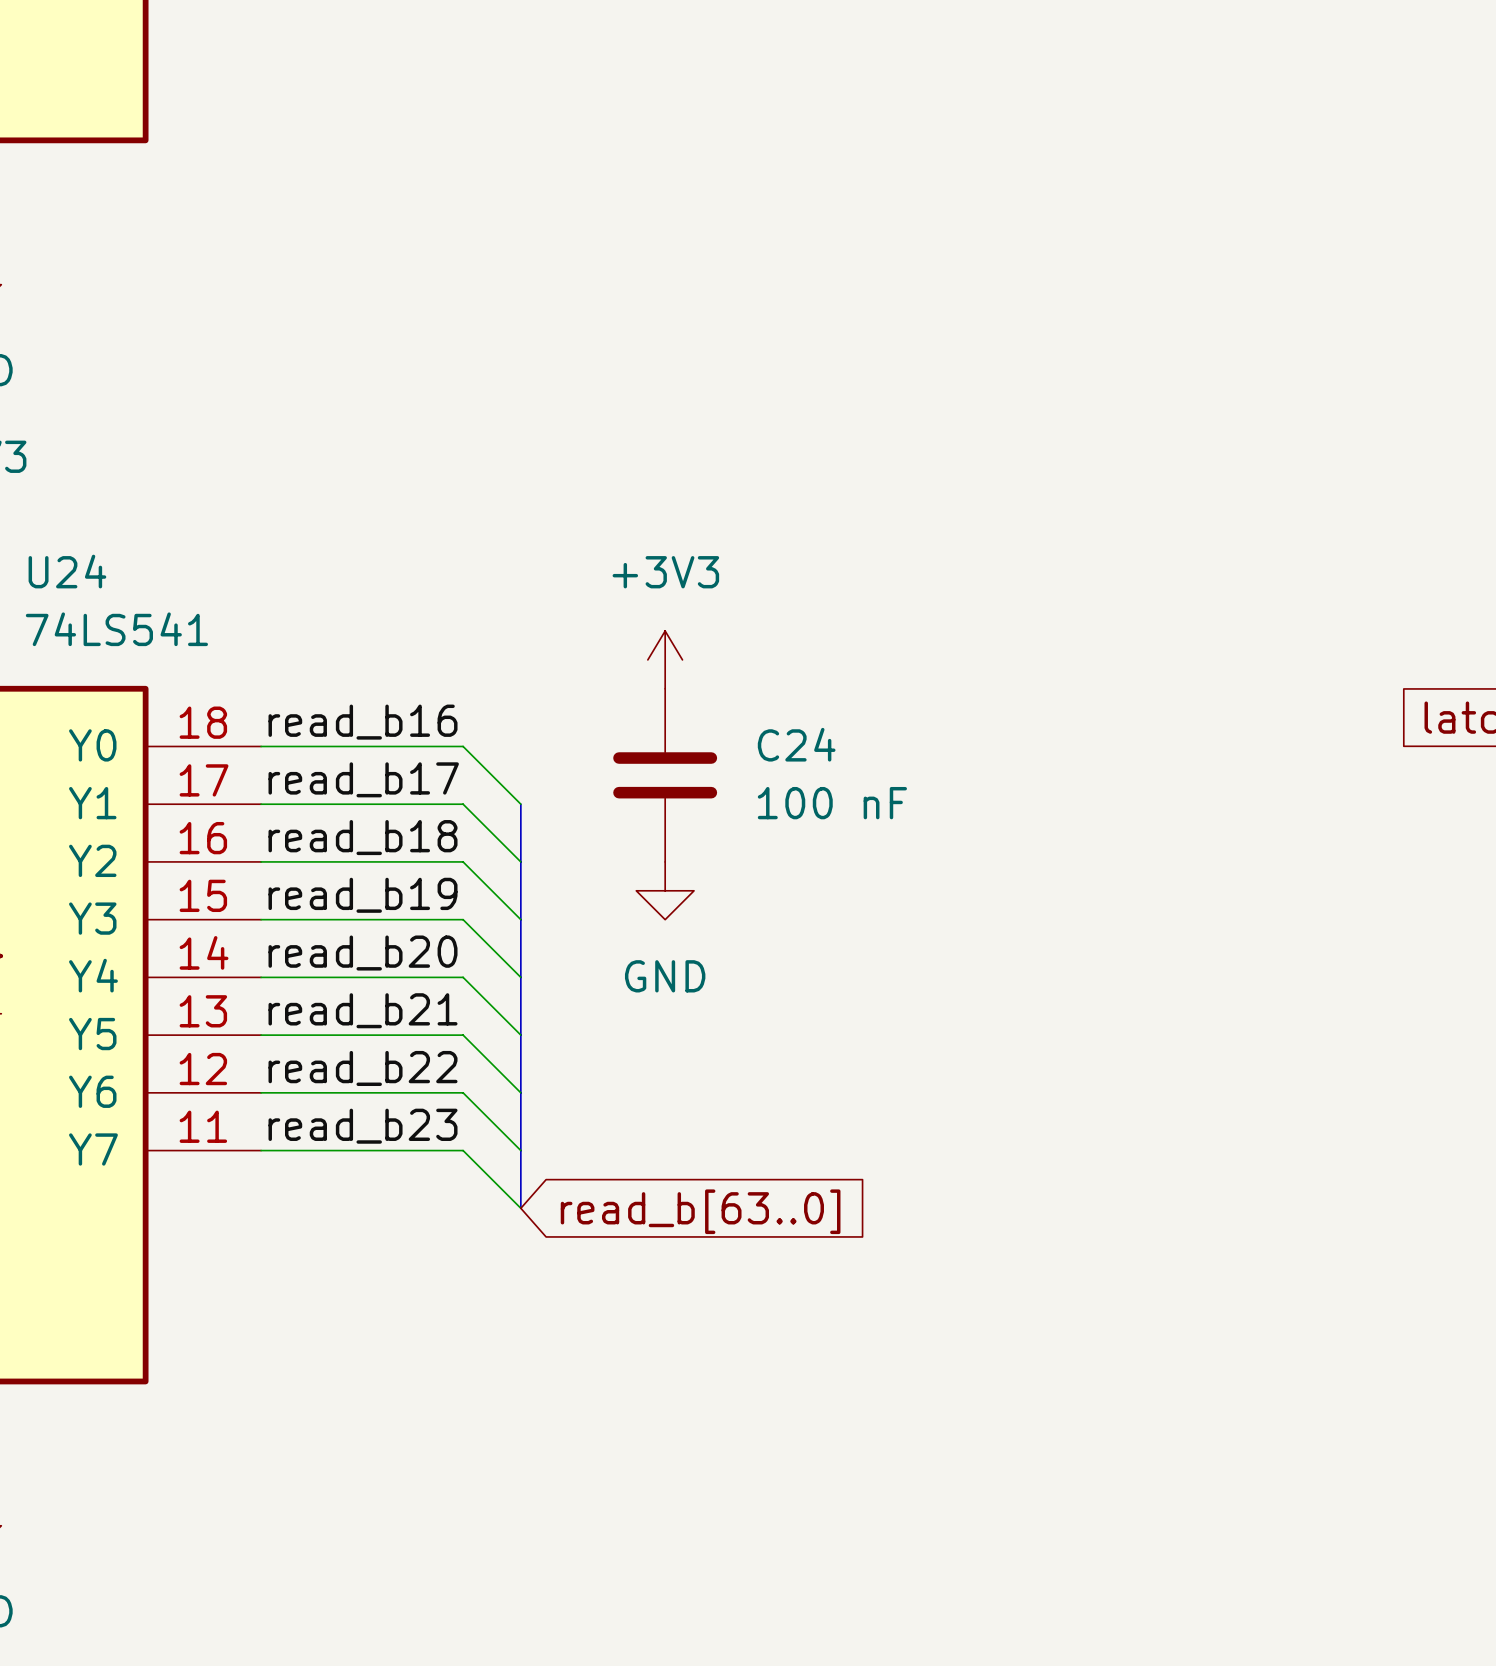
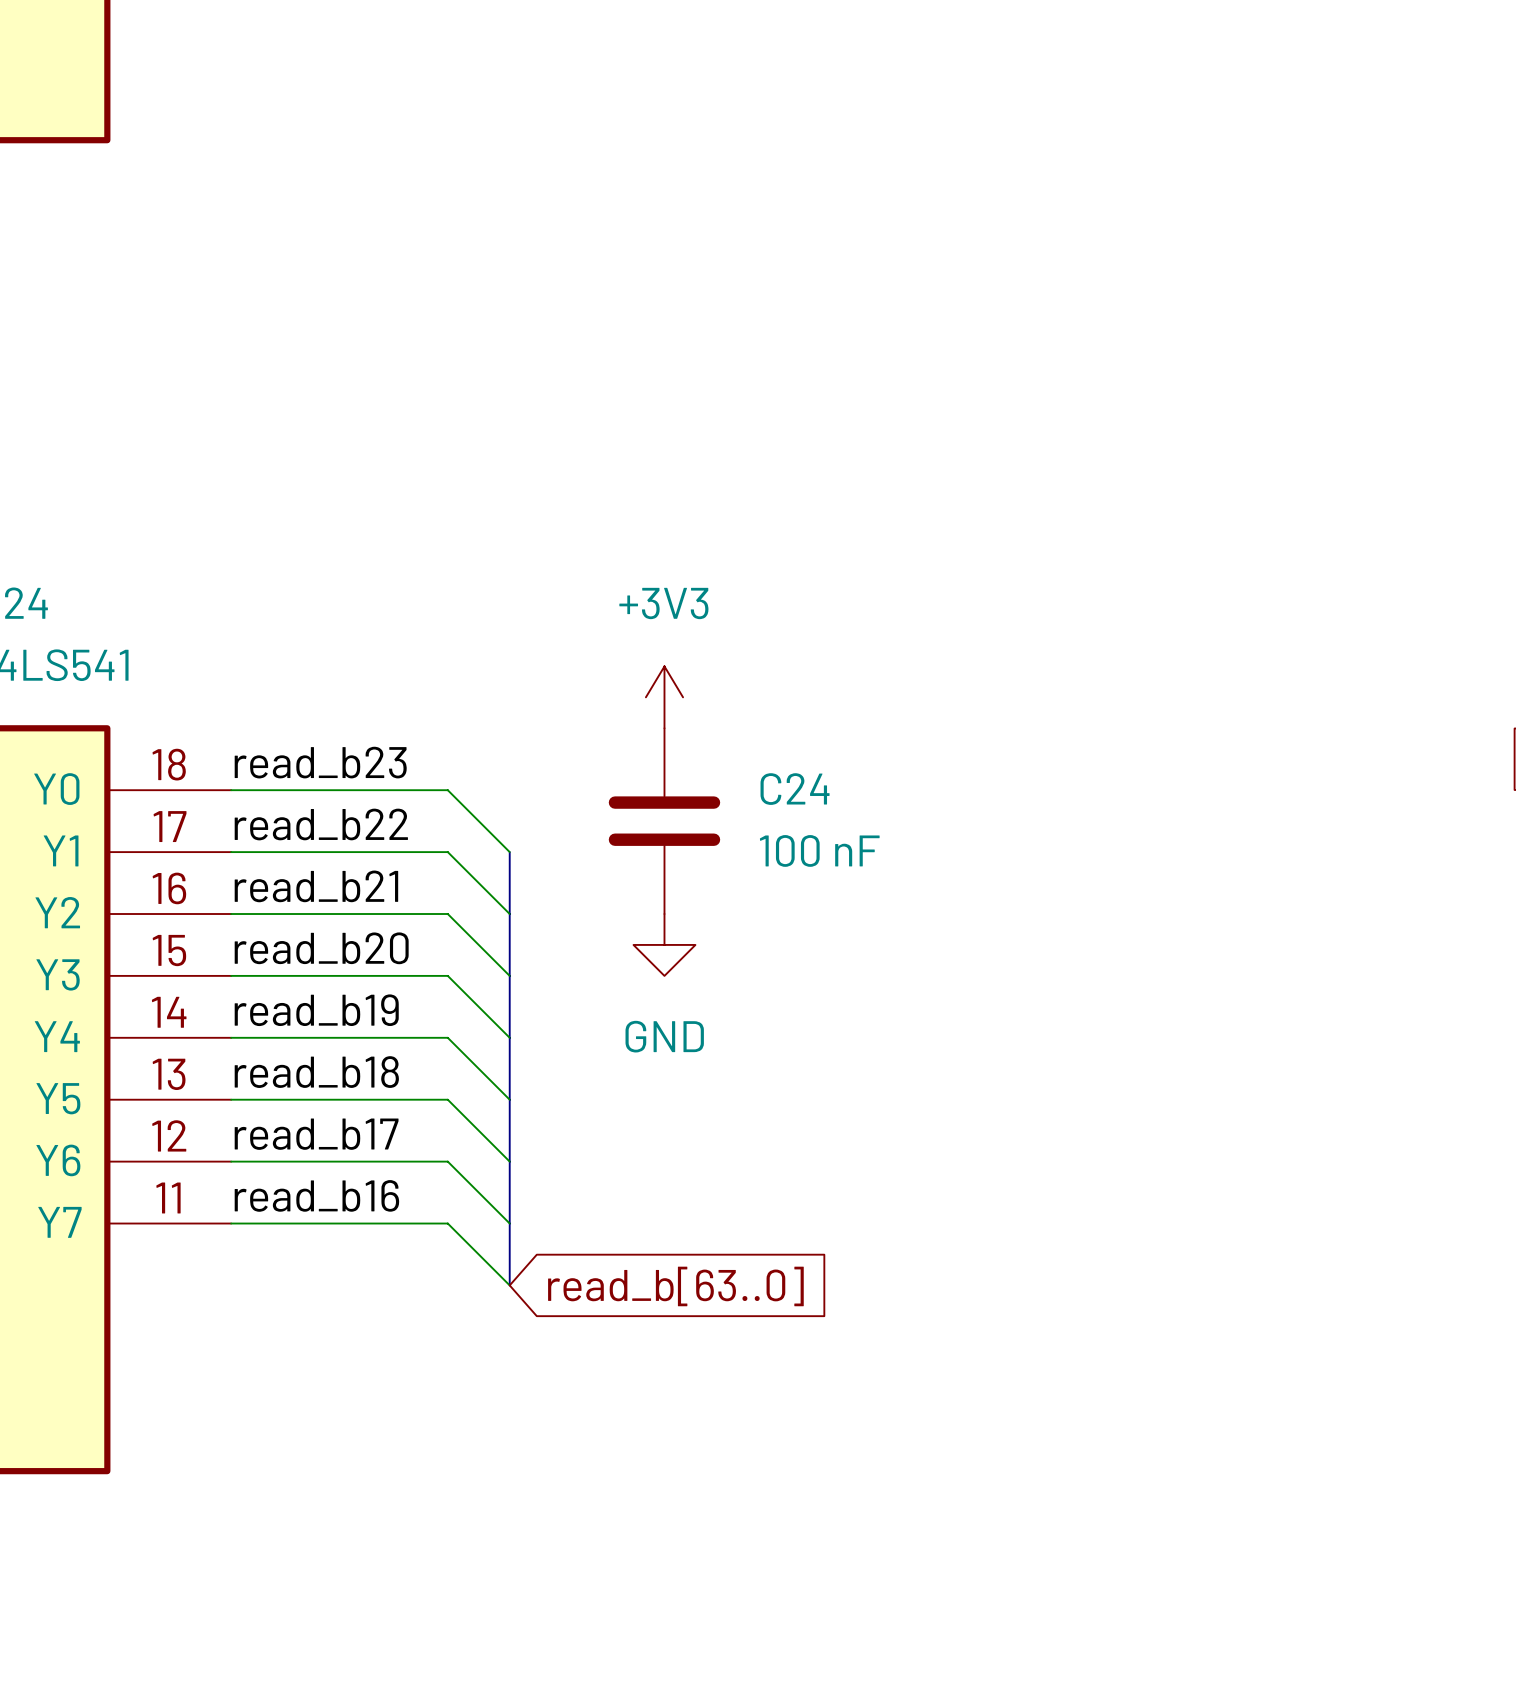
label: read_b16 (363, 722) -> read_b23 (320, 762)
label: read_b17 (363, 779) -> read_b22 (321, 824)
label: read_b18 (363, 837) -> read_b21 (316, 886)
label: read_b19 (363, 895) -> read_b20 (321, 948)
label: read_b20 (363, 953) -> read_b19 (316, 1010)
label: read_b21 (363, 1010) -> read_b18 (316, 1072)
label: read_b22 (363, 1068) -> read_b17 (316, 1134)
label: read_b23 (363, 1126) -> read_b16 (316, 1195)

